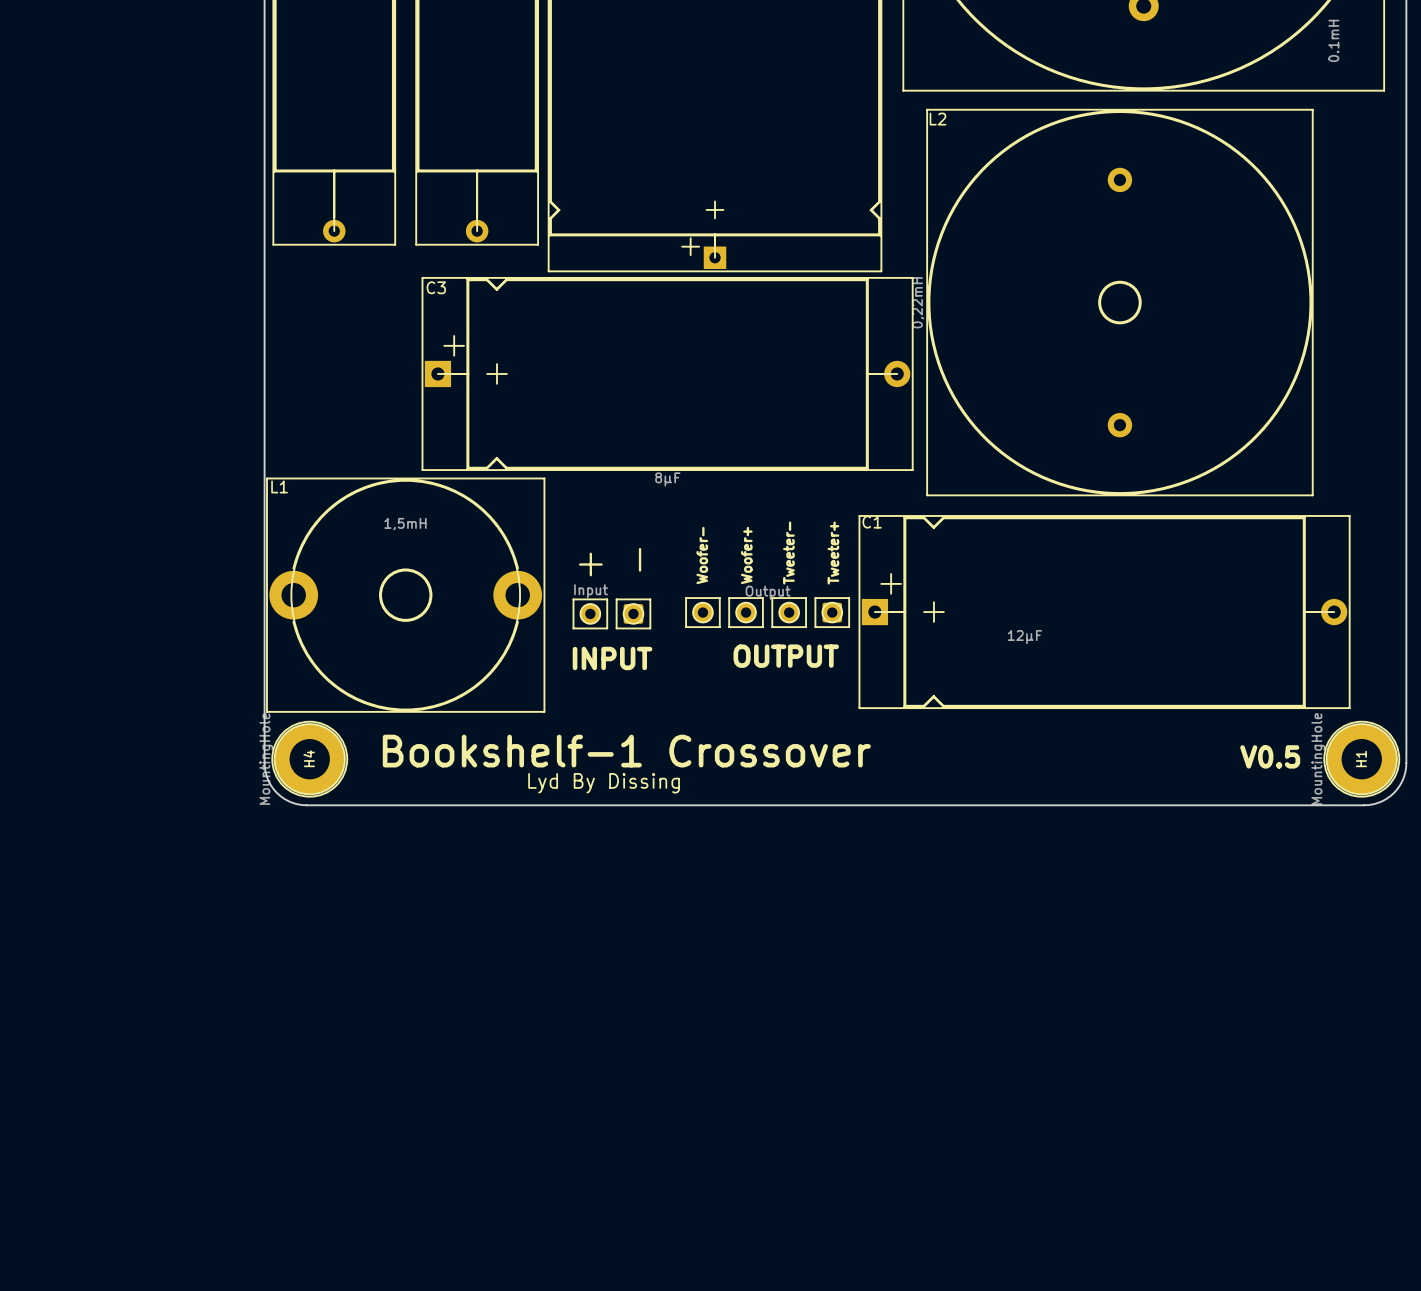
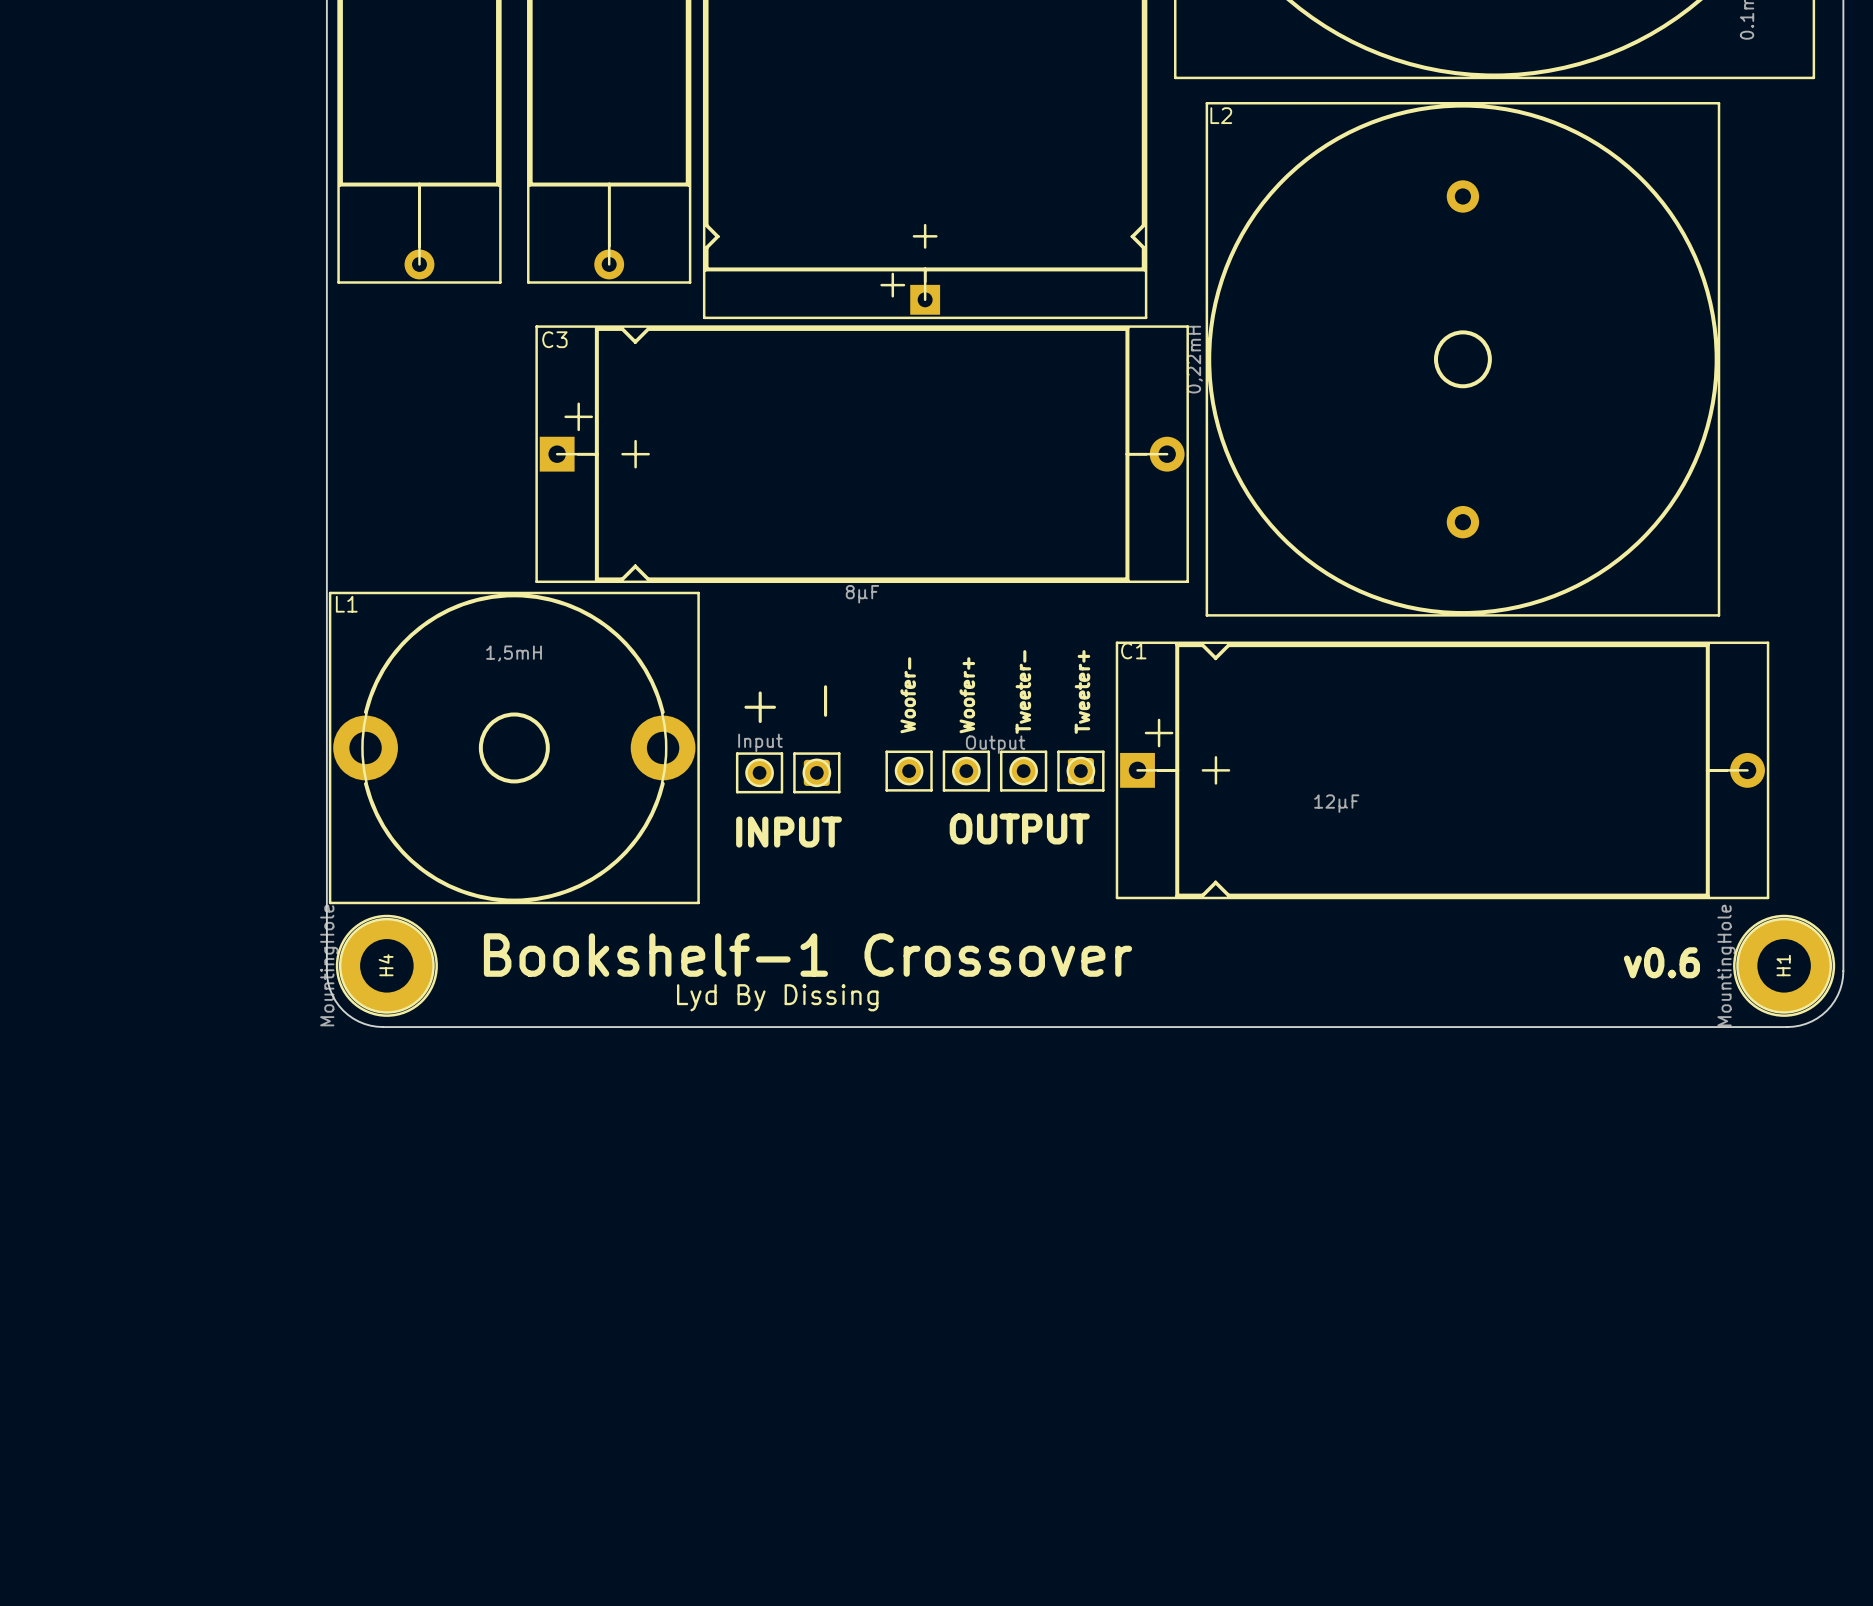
text: V0.5 (1270, 756) -> v0.6 (1661, 962)

